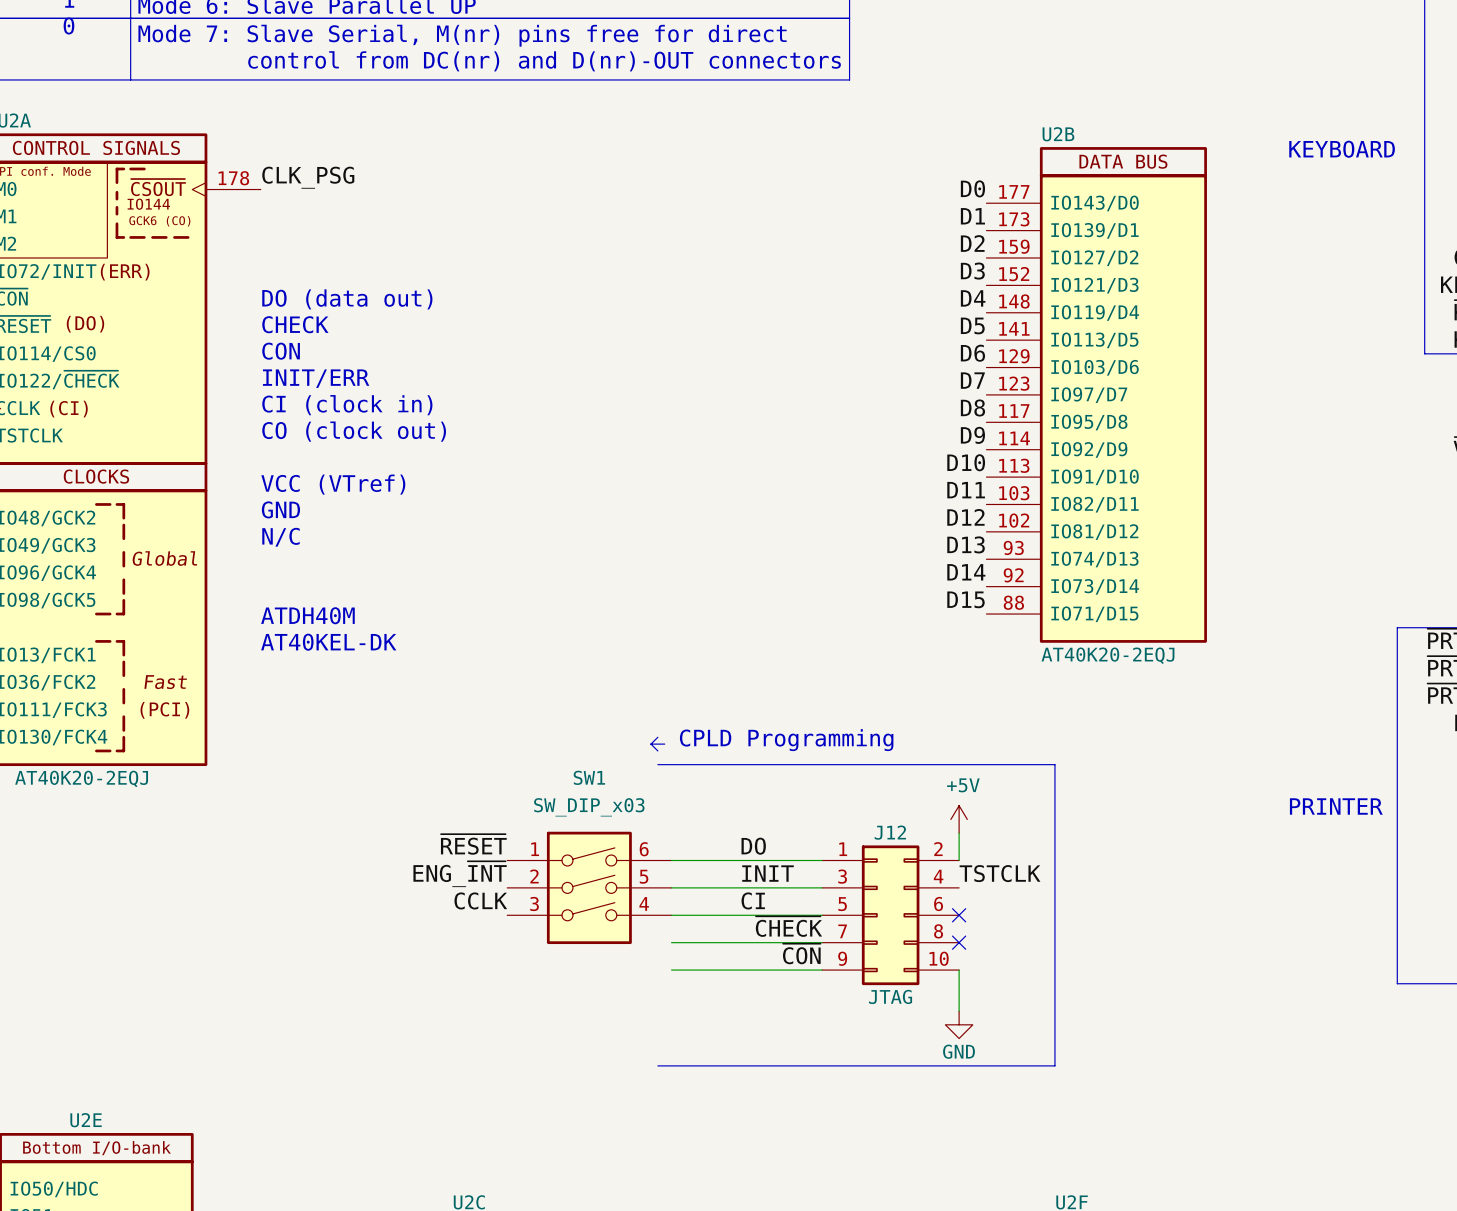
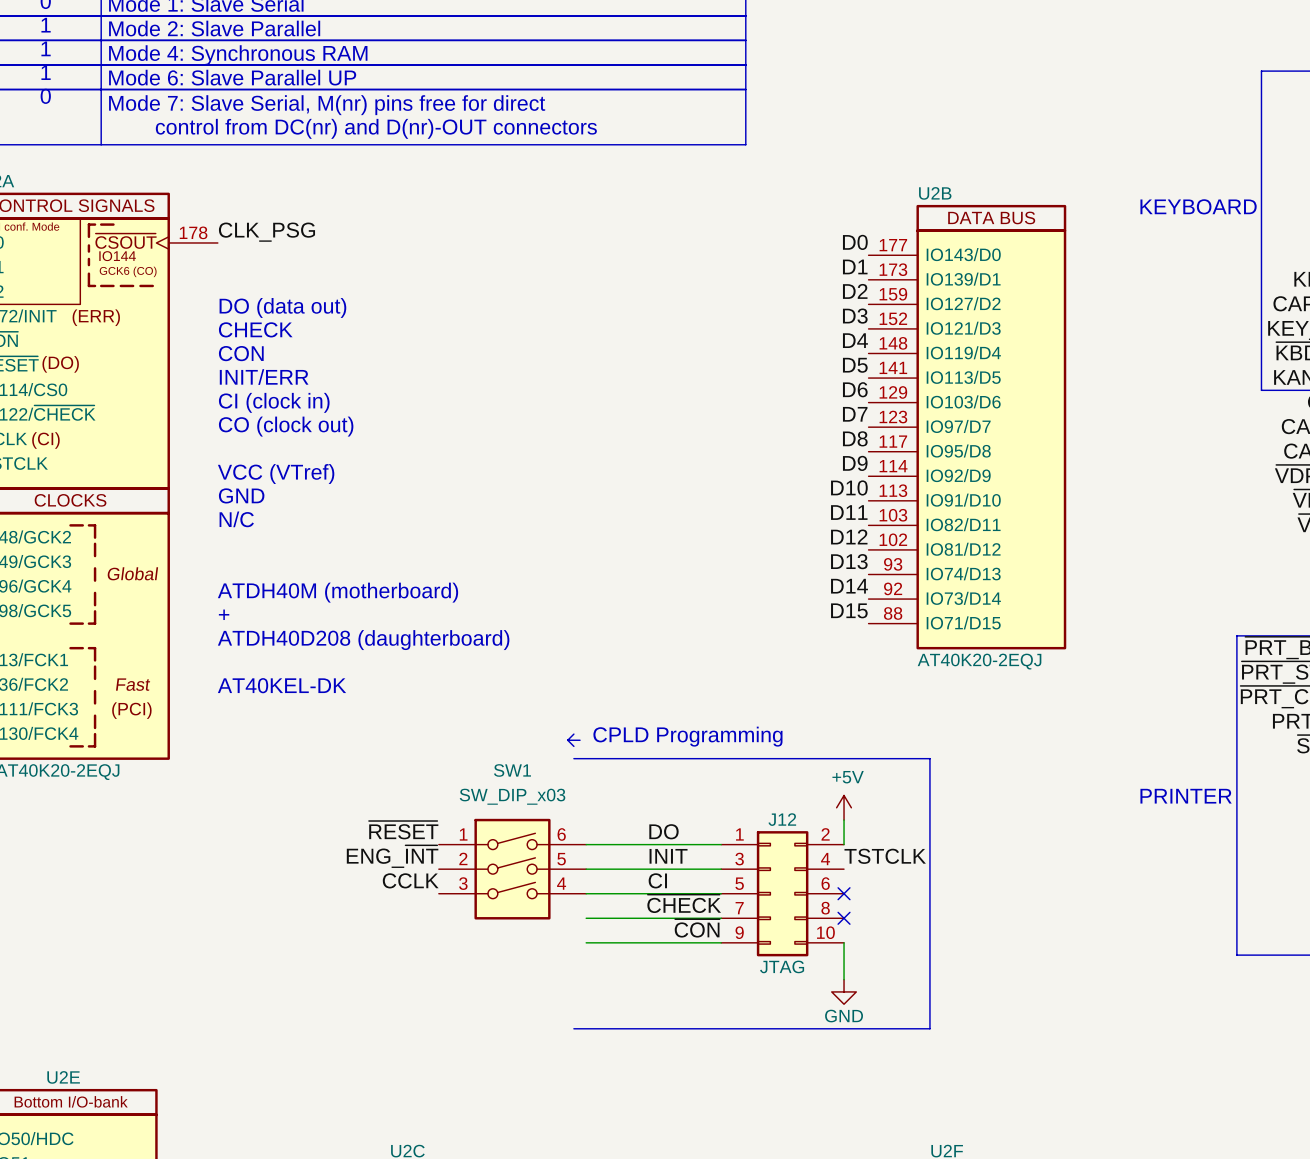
text position: DO (data out) (347, 299) -> DO (data out) (282, 307)
text position: CHECK (295, 324) -> CHECK (255, 329)
text position: CON (281, 351) -> CON (241, 353)
text position: INIT/ERR (316, 378) -> INIT/ERR (264, 377)
text position: CI (clock in) (347, 405) -> CI (clock in) (274, 402)
text position: CO (clock out) (354, 431) -> CO (clock out) (286, 426)
text position: VCC (VTref) (333, 484) -> VCC (VTref) (276, 474)
text position: GND (280, 509) -> GND (241, 495)
text position: N/C (280, 537) -> N/C (236, 519)
text: none -> ATDH40M (motherboard) (337, 592)
text: none -> + (224, 614)
text: ATDH40M (307, 615) -> none
text: none -> ATDH40D208 (daughterboard) (363, 640)
text position: AT40KEL-DK (328, 642) -> AT40KEL-DK (282, 685)

